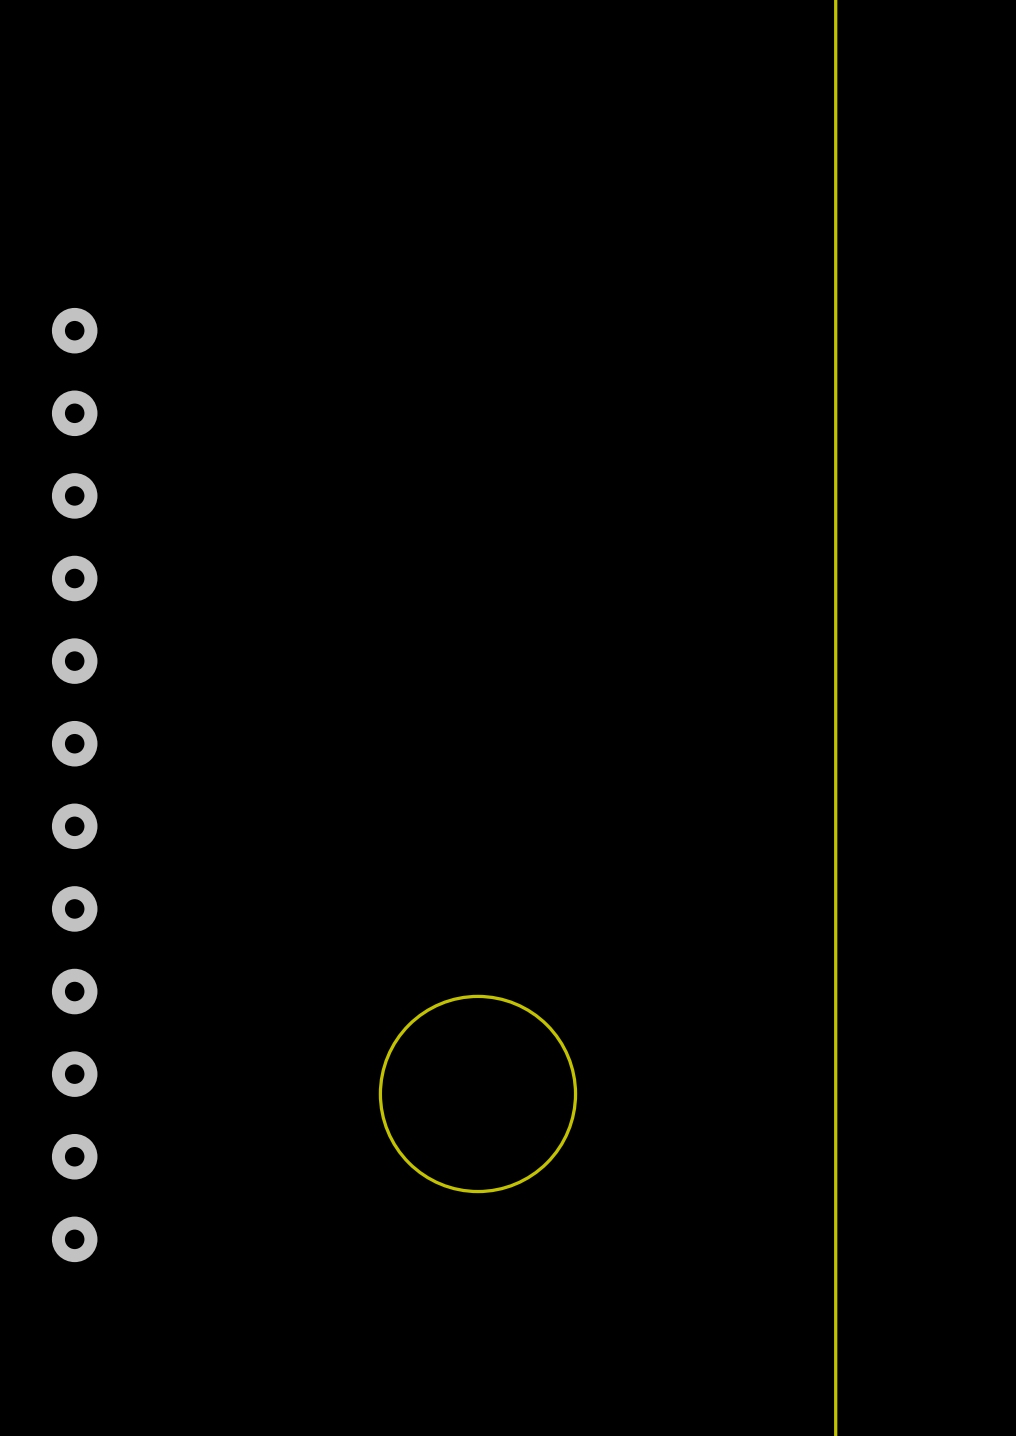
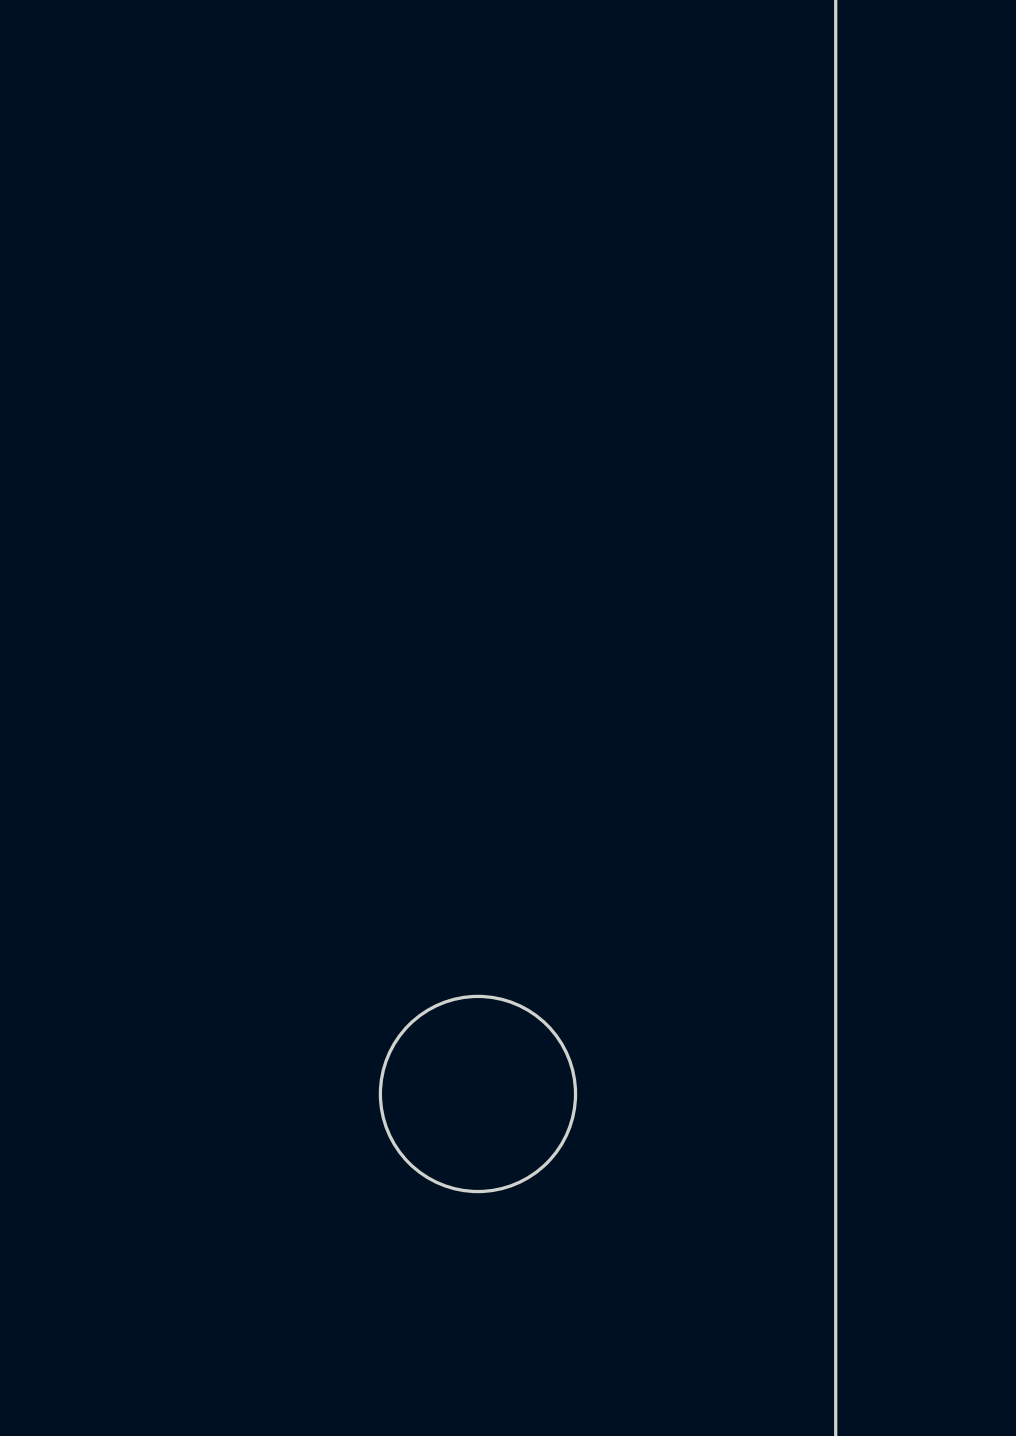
via: (74, 330) -> none
via: (74, 413) -> none
via: (74, 495) -> none
via: (74, 578) -> none
via: (74, 661) -> none
via: (74, 743) -> none
via: (74, 826) -> none
via: (74, 908) -> none
via: (74, 991) -> none
via: (74, 1074) -> none
via: (74, 1156) -> none
via: (74, 1239) -> none

